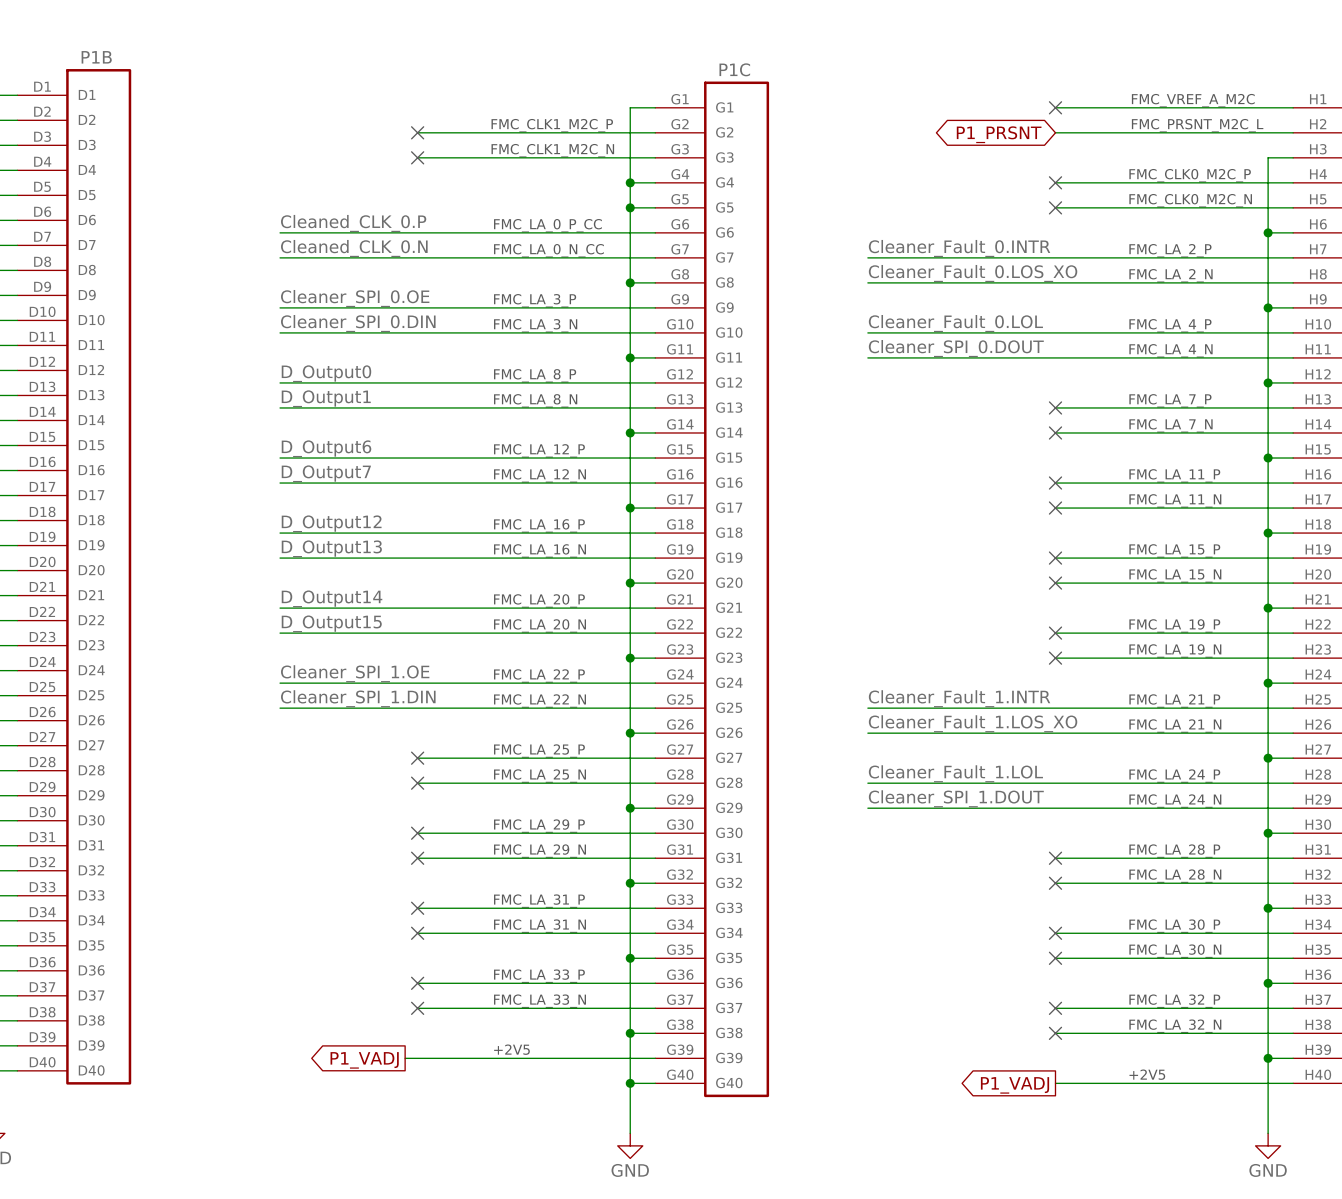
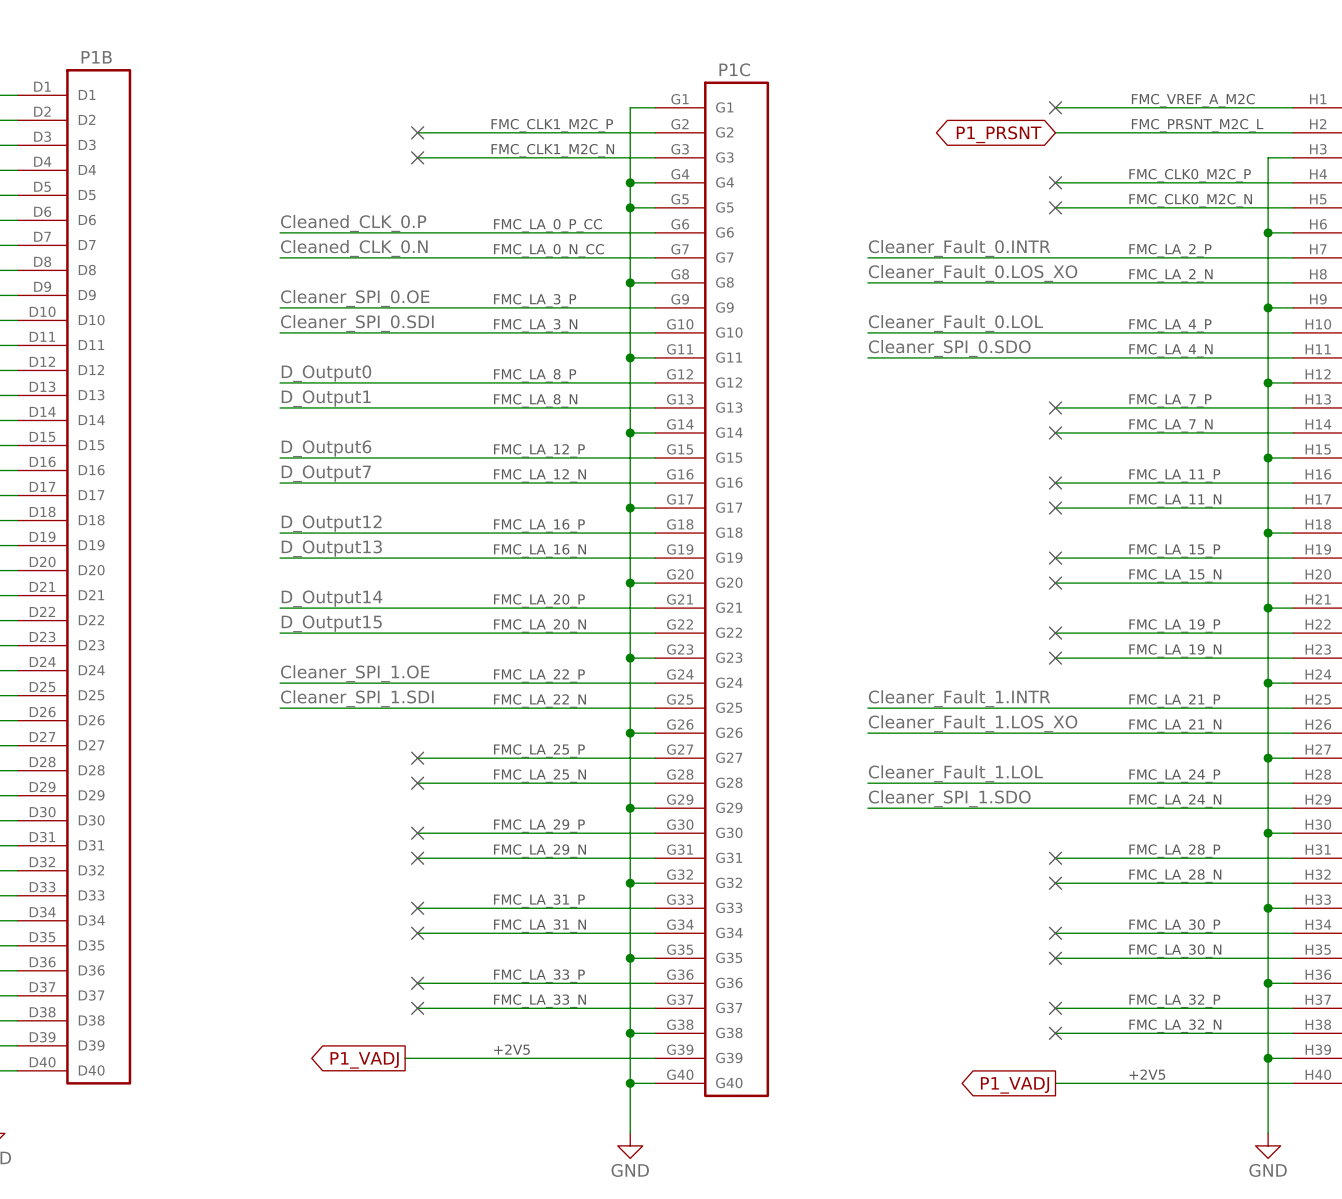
label: Cleaner_SPI_0.DIN (358, 323) -> Cleaner_SPI_0.SDI (357, 323)
label: Cleaner_SPI_0.DOUT (956, 348) -> Cleaner_SPI_0.SDO (949, 348)
label: Cleaner_SPI_1.DIN (358, 698) -> Cleaner_SPI_1.SDI (357, 698)
label: Cleaner_SPI_1.DOUT (956, 798) -> Cleaner_SPI_1.SDO (949, 798)

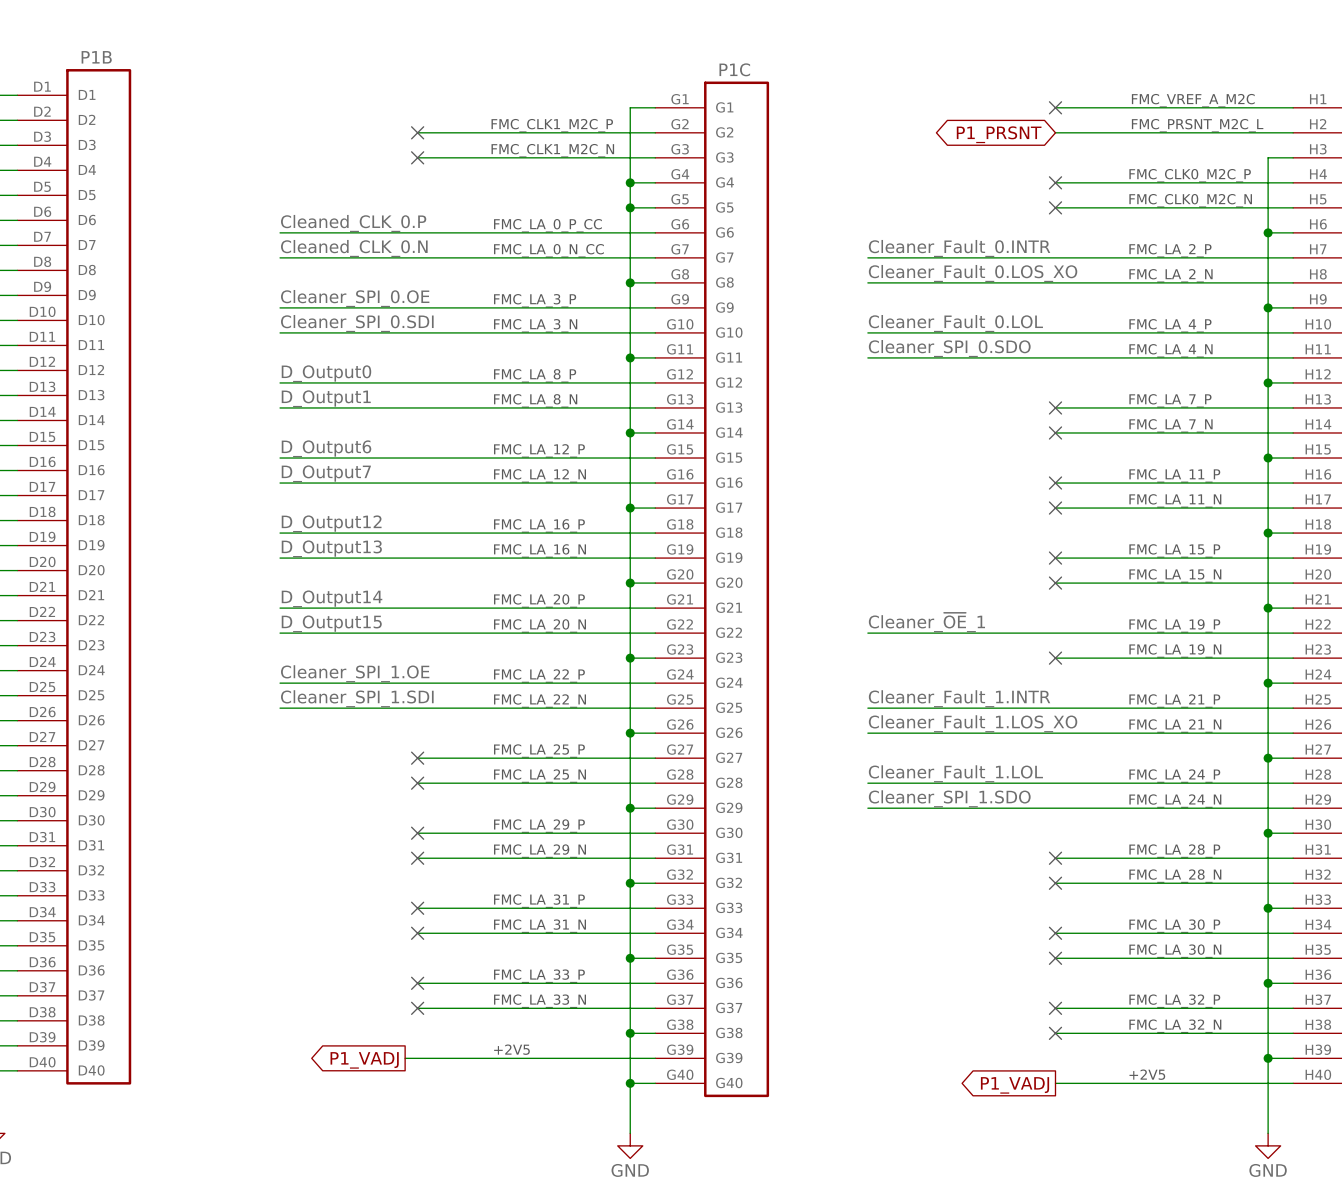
label: none -> Cleaner_~{OE}_1 (926, 622)
wire: none -> (867, 633) (1055, 633)
no-connect mark: (1055, 633) -> none

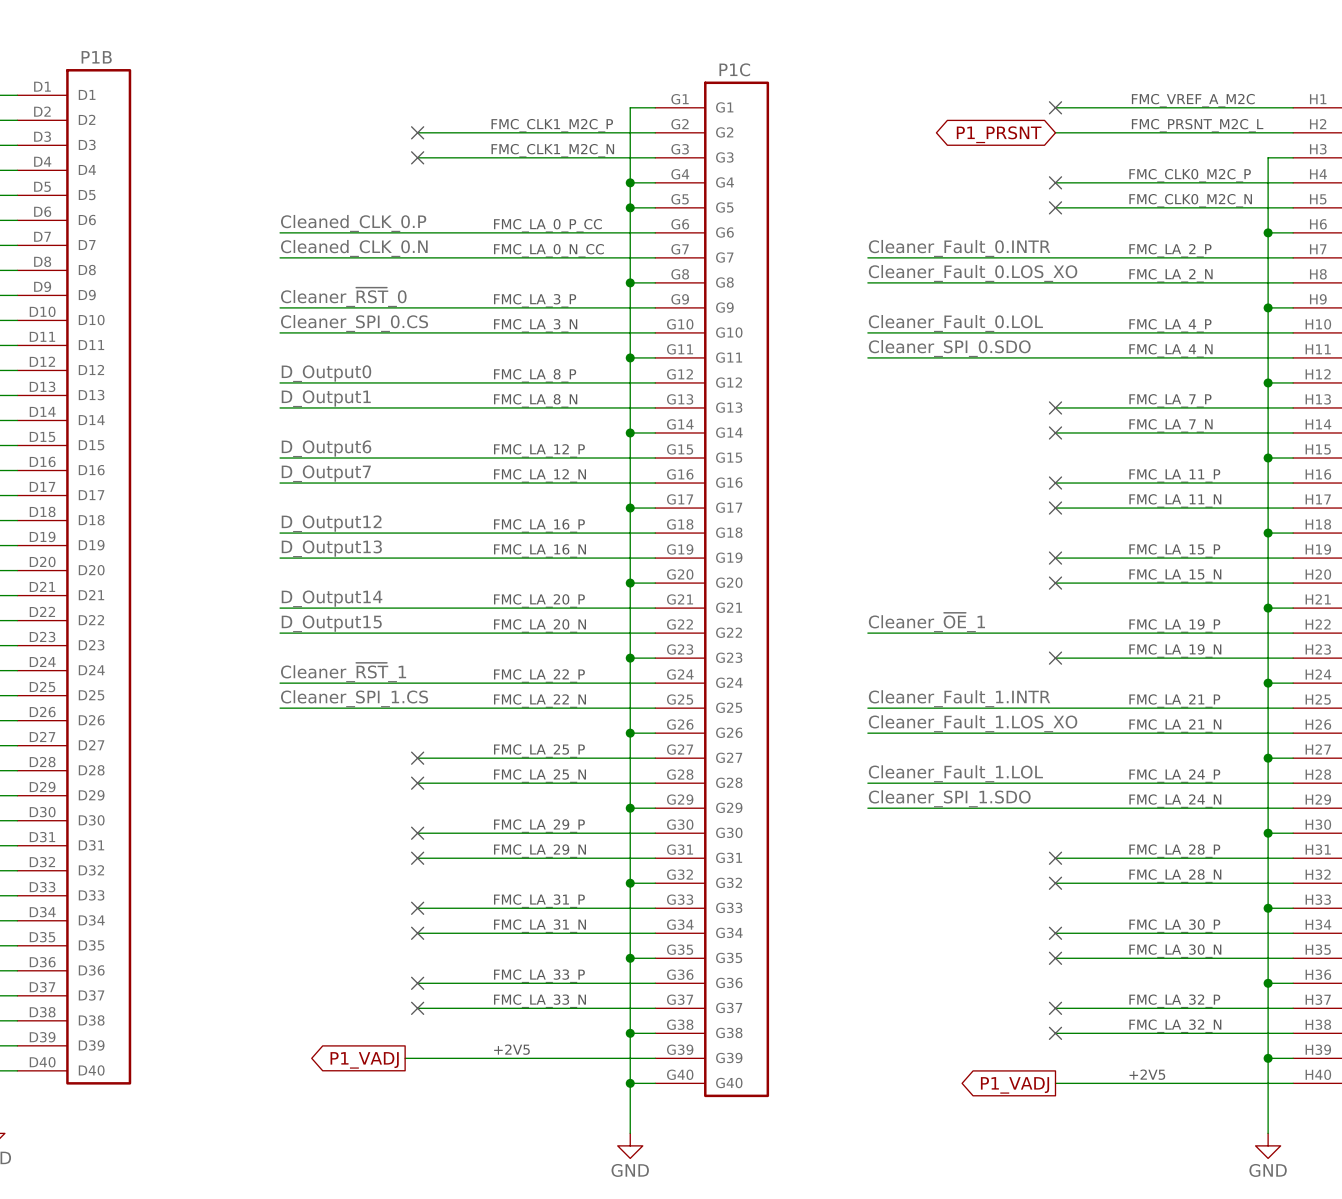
label: Cleaner_SPI_0.OE (355, 298) -> Cleaner_~{RST}_0 (343, 297)
label: Cleaner_SPI_0.SDI (357, 323) -> Cleaner_SPI_0.CS (354, 323)
label: Cleaner_SPI_1.OE (355, 673) -> Cleaner_~{RST}_1 (343, 672)
label: Cleaner_SPI_1.SDI (357, 698) -> Cleaner_SPI_1.CS (354, 698)

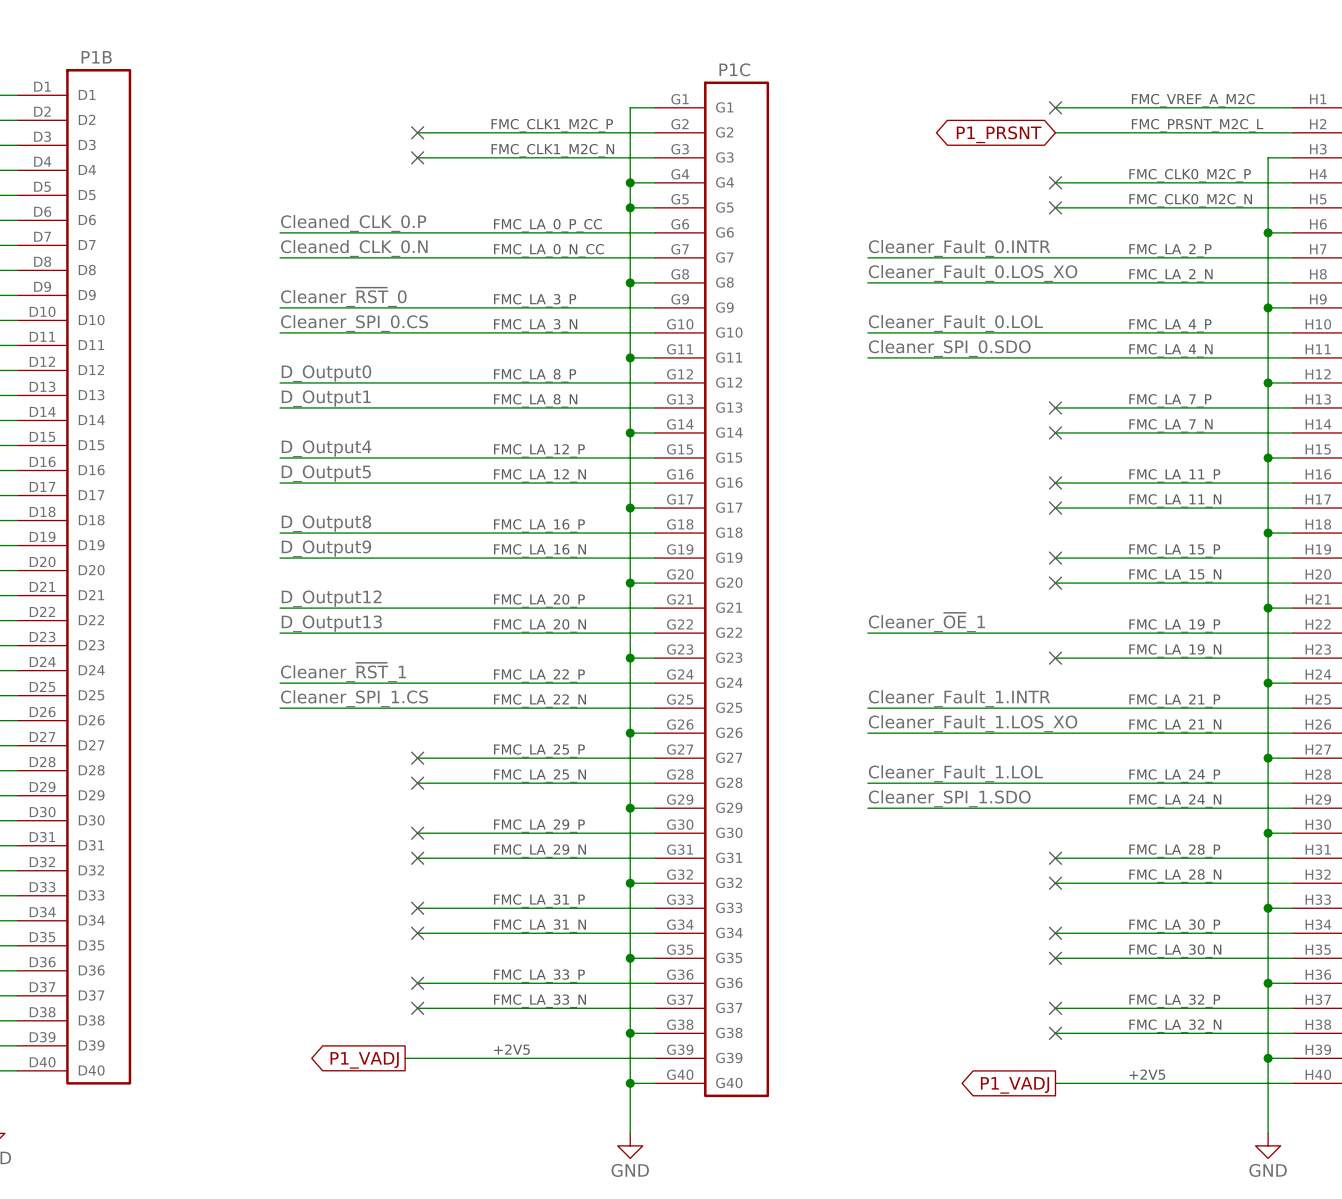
label: D_Output6 (326, 448) -> D_Output4 (326, 448)
label: D_Output7 (326, 473) -> D_Output5 (326, 473)
label: D_Output12 (331, 523) -> D_Output8 (326, 523)
label: D_Output13 (331, 548) -> D_Output9 (326, 548)
label: D_Output14 (332, 598) -> D_Output12 (331, 598)
label: D_Output15 (331, 623) -> D_Output13 (331, 623)

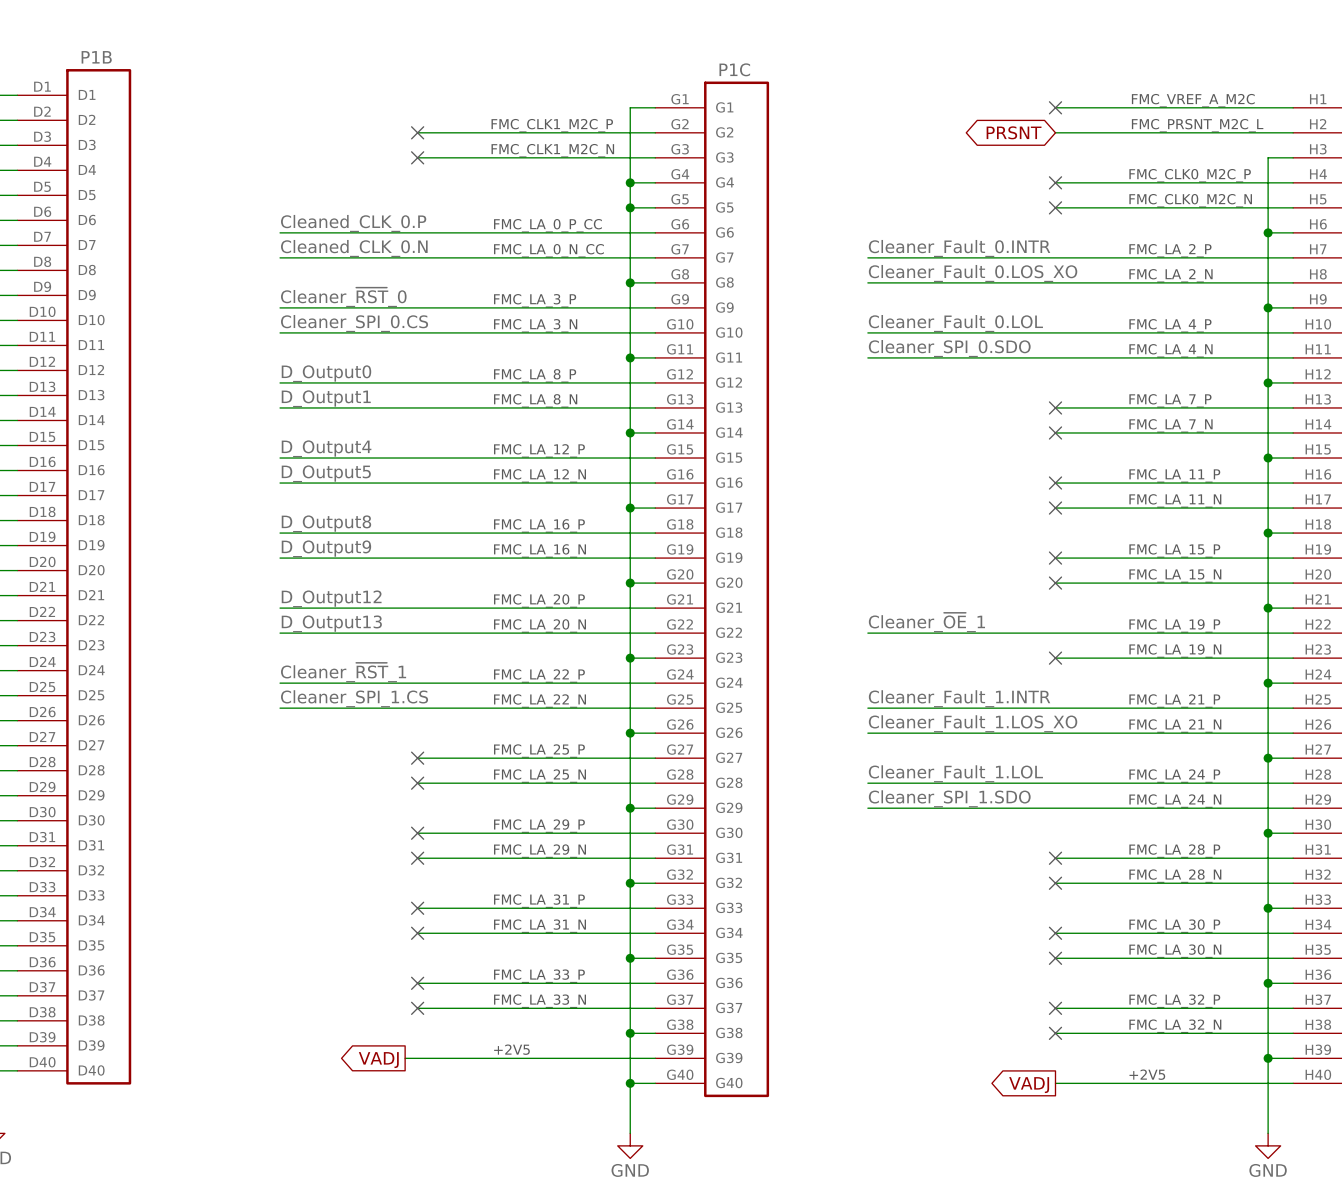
global label: P1_PRSNT (999, 134) -> PRSNT (1014, 132)
global label: P1_VADJ (364, 1060) -> VADJ (378, 1060)
global label: P1_VADJ (1015, 1085) -> VADJ (1029, 1085)

